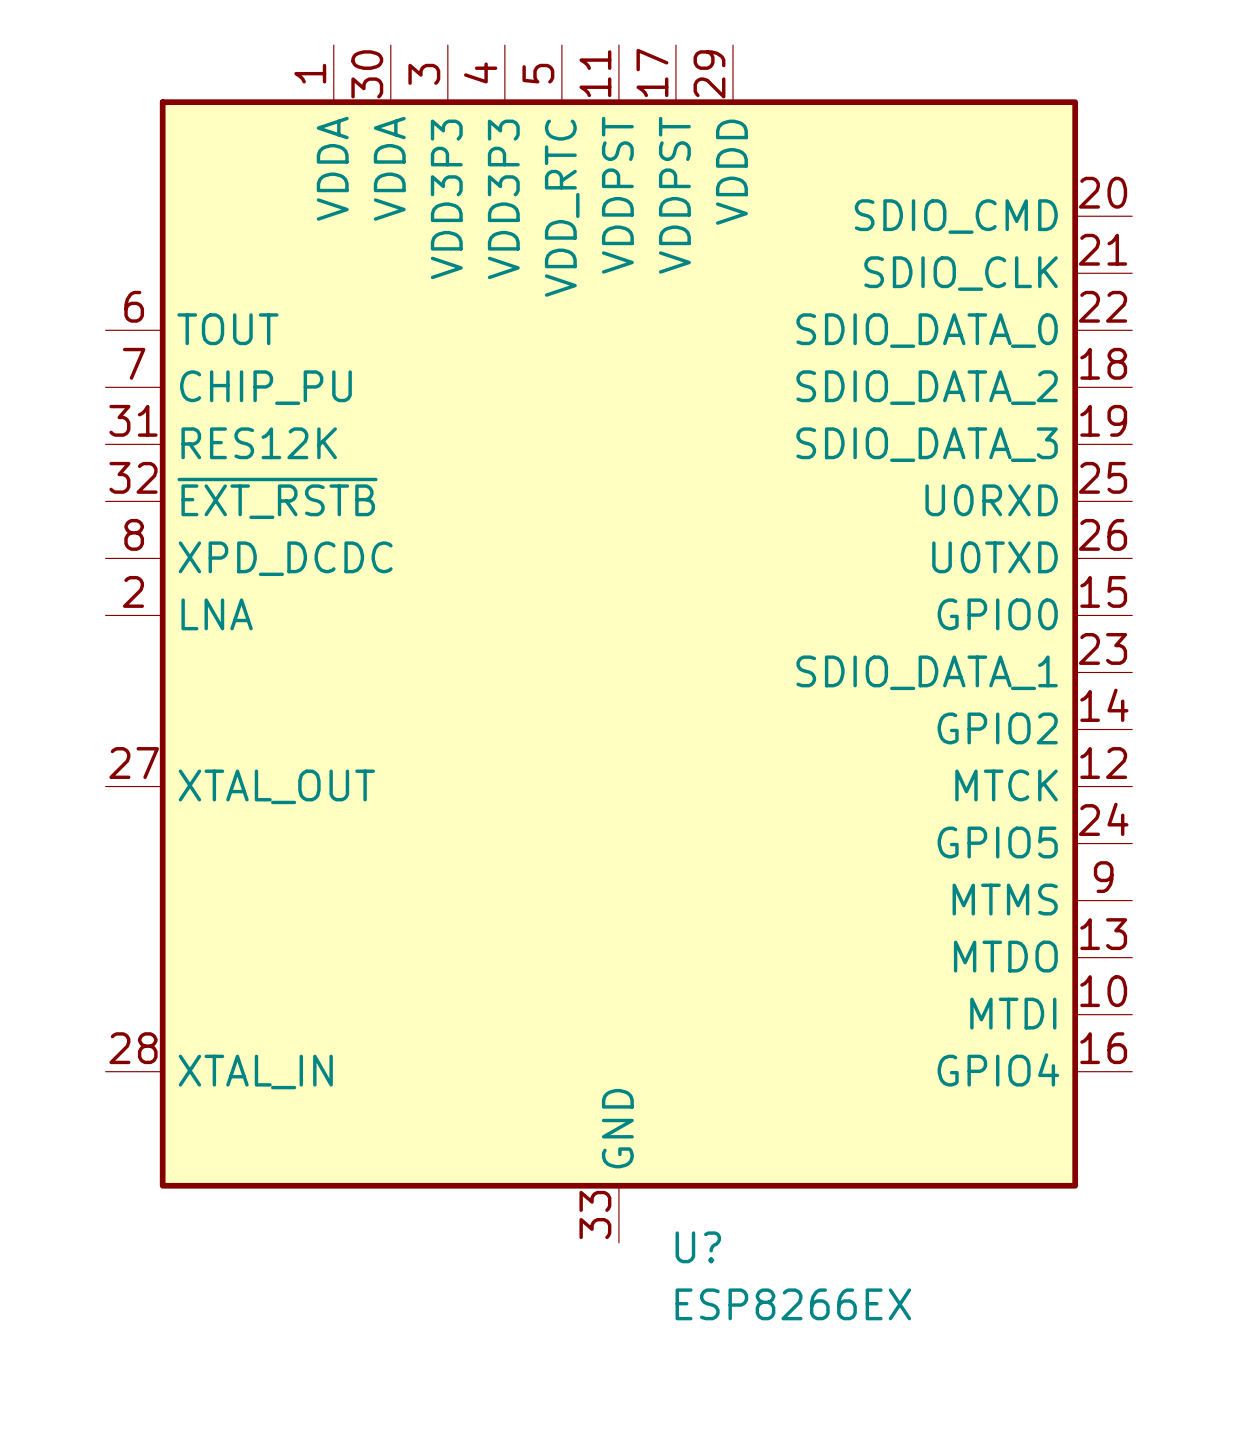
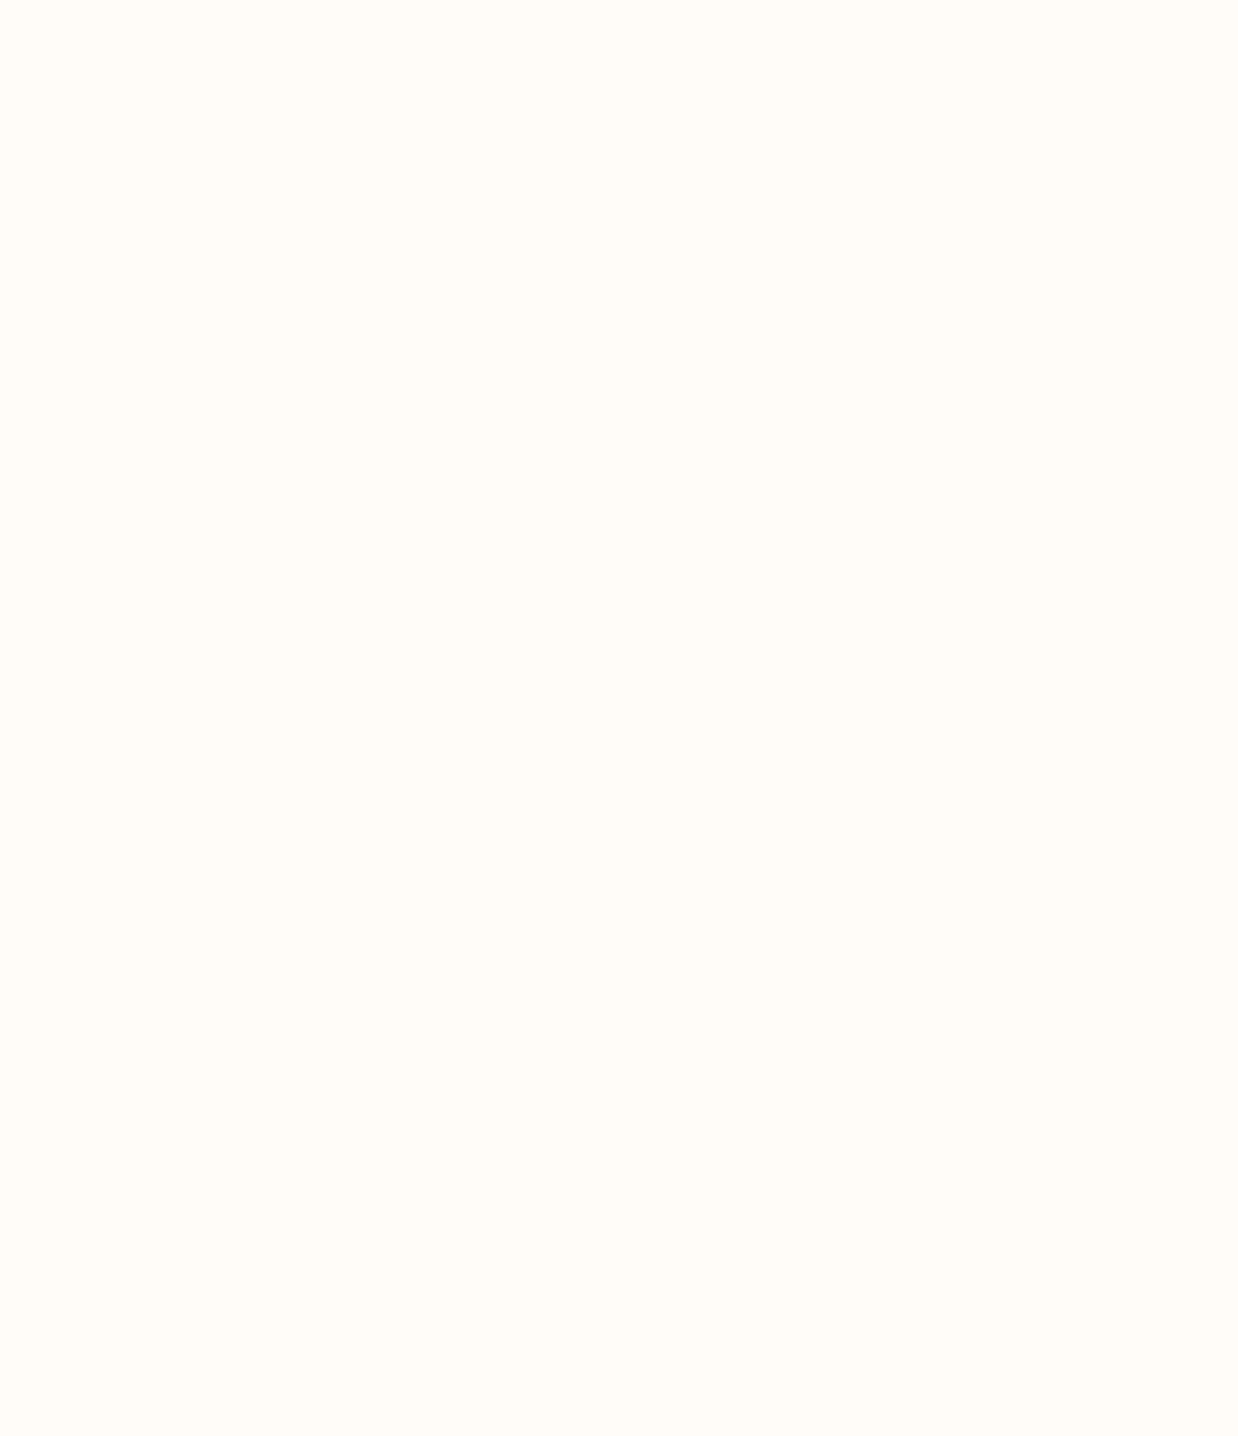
U?: ESP8266EX (618, 643) -> none

